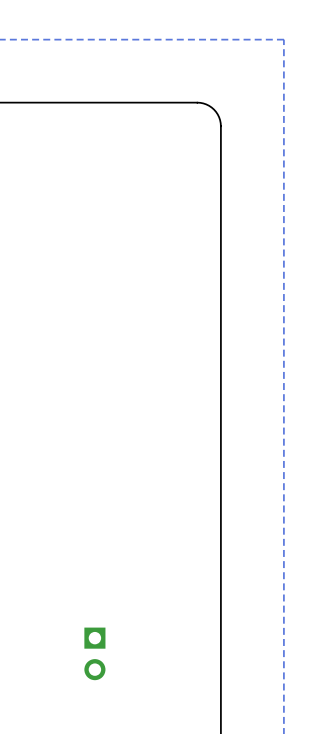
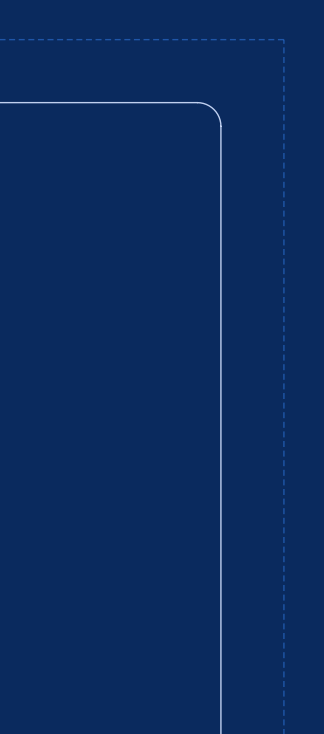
part: (94, 653) -> none

